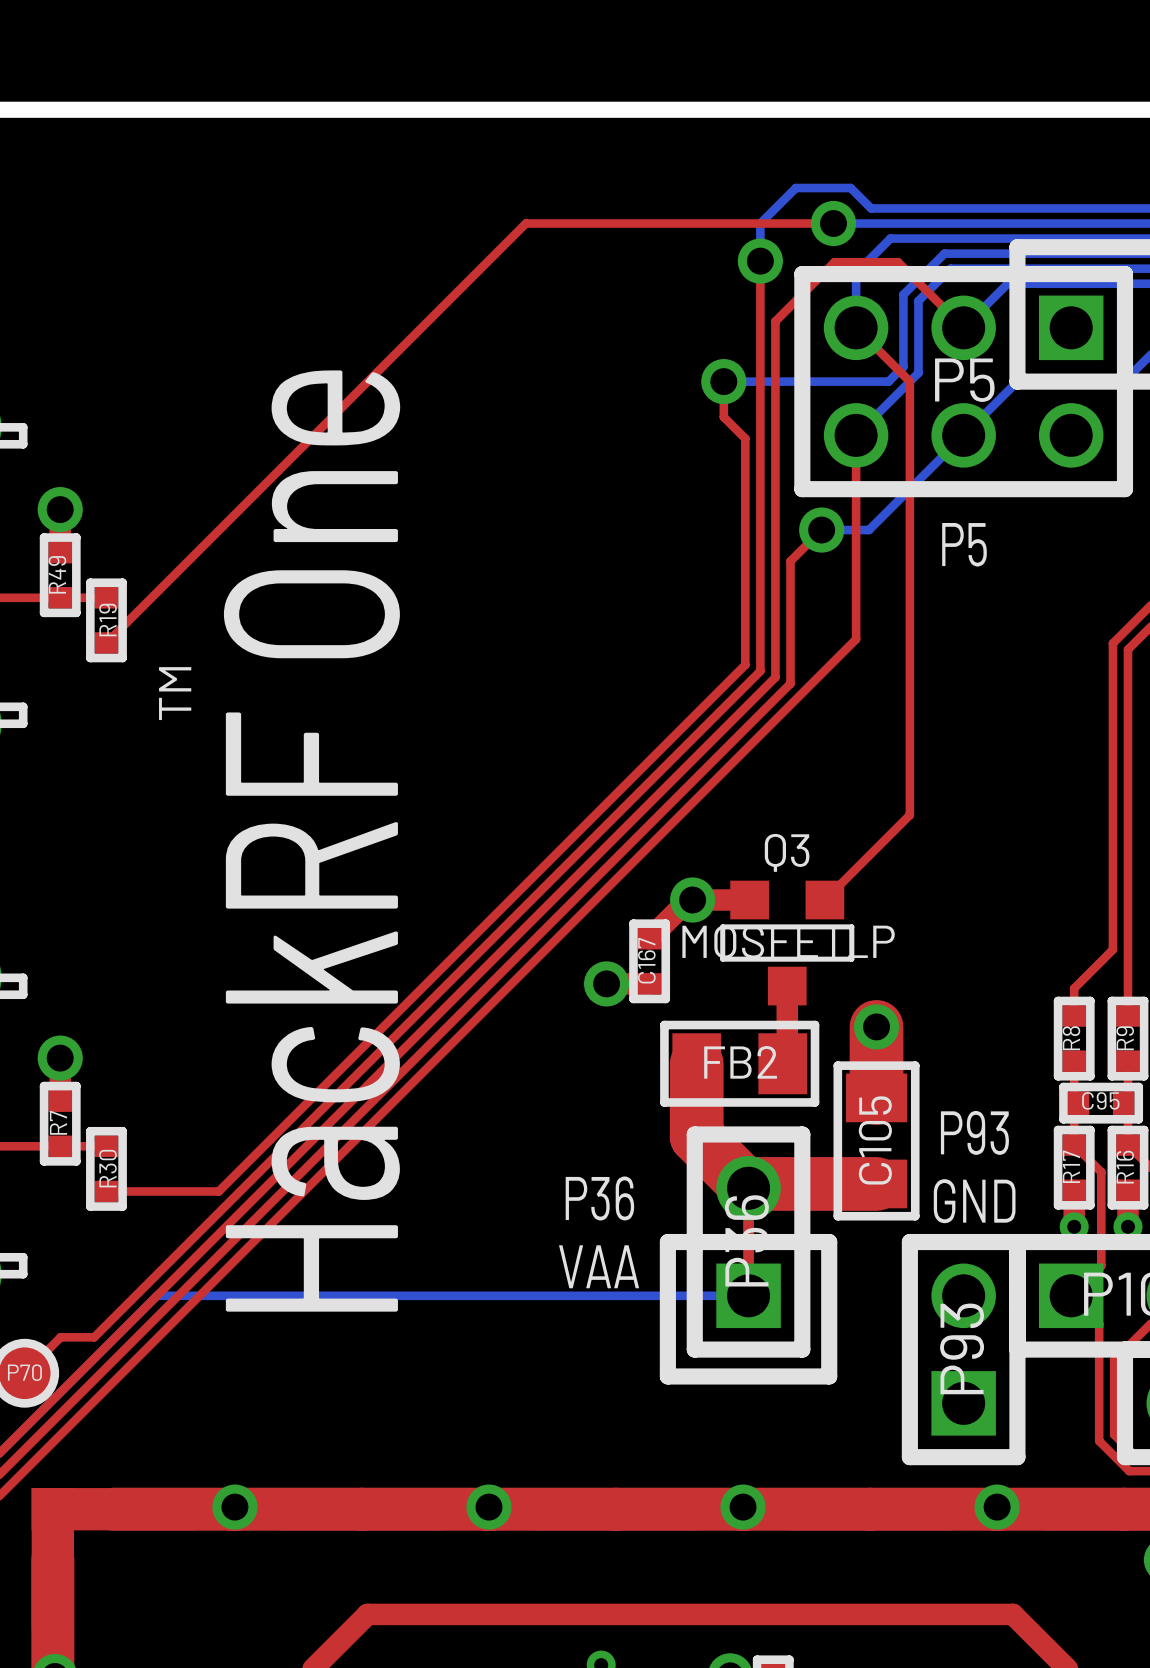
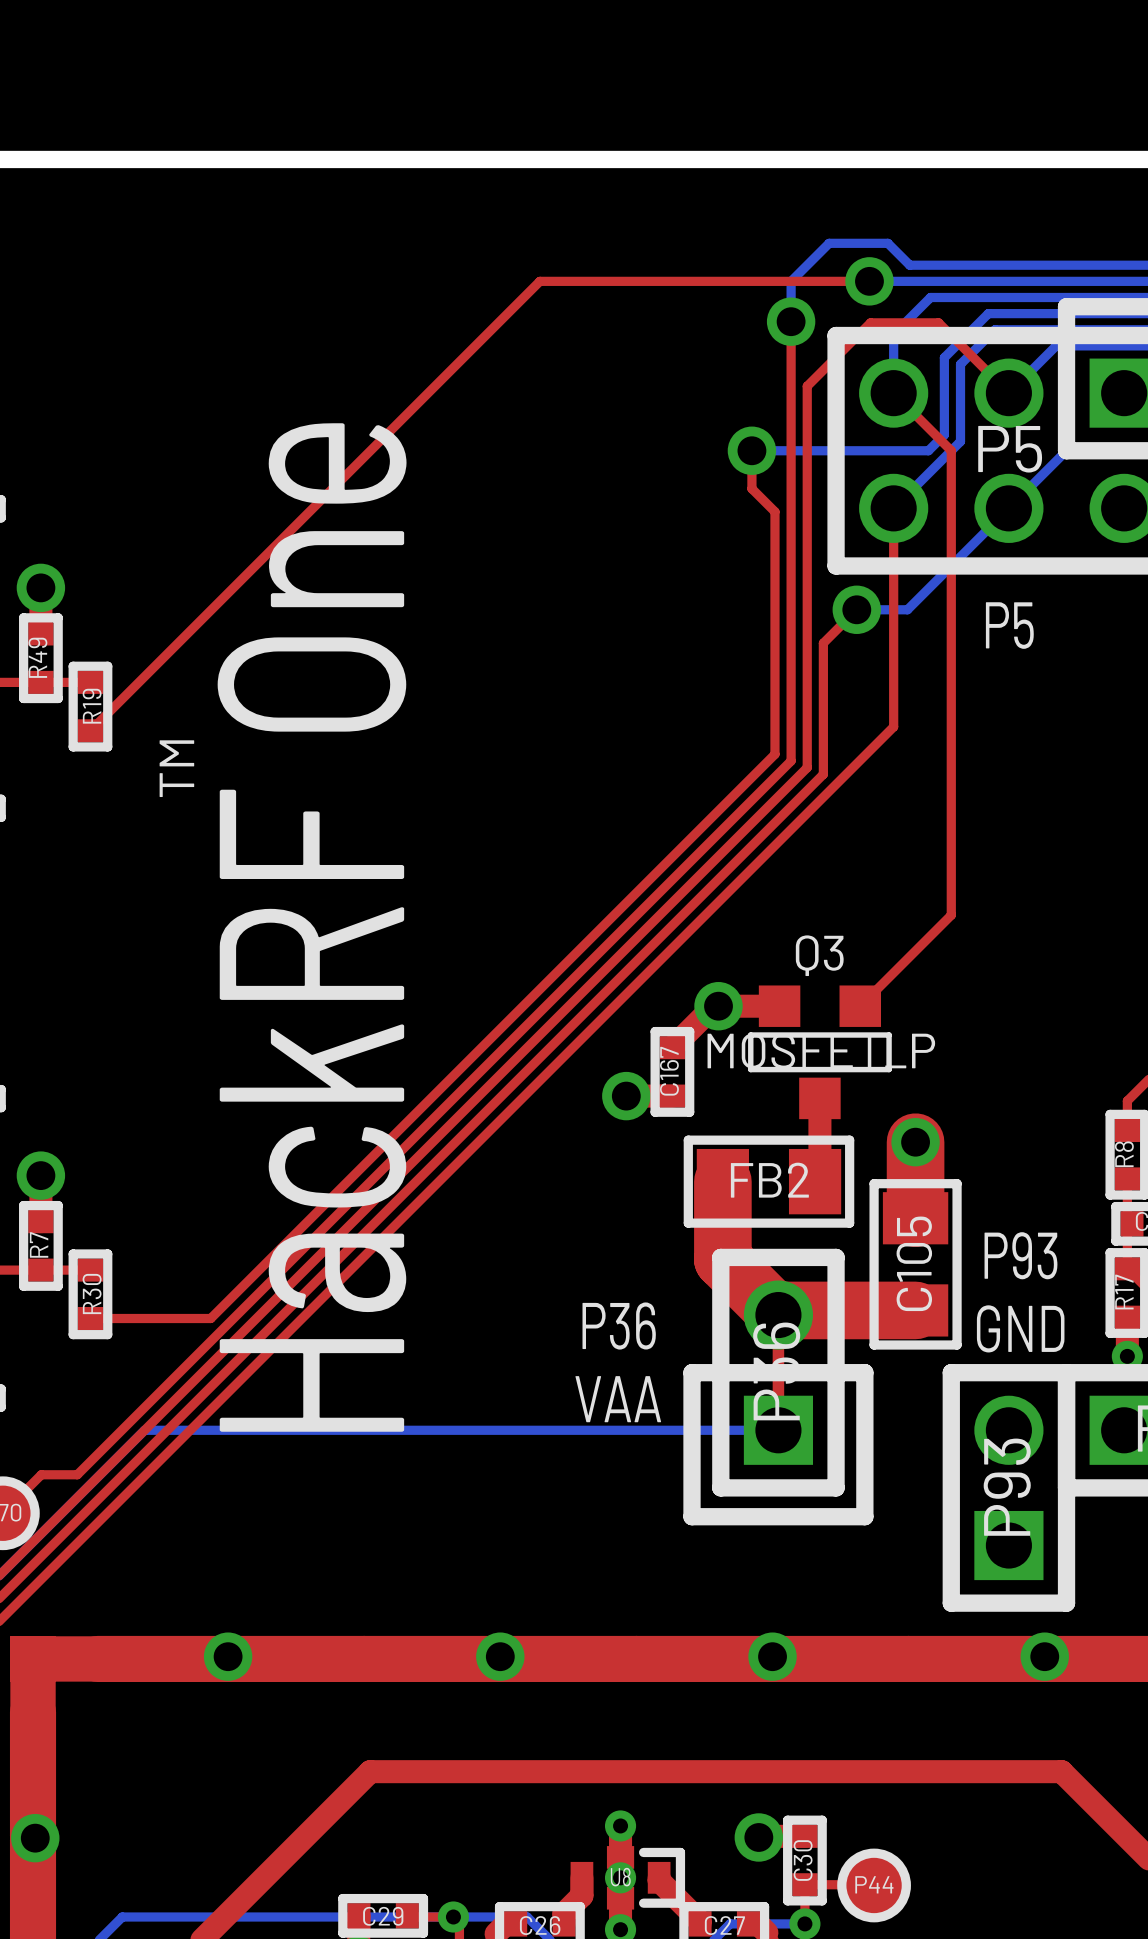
text position: TM (175, 693) -> TM (176, 768)
text position: HackRF One (312, 841) -> HackRF One (312, 927)

